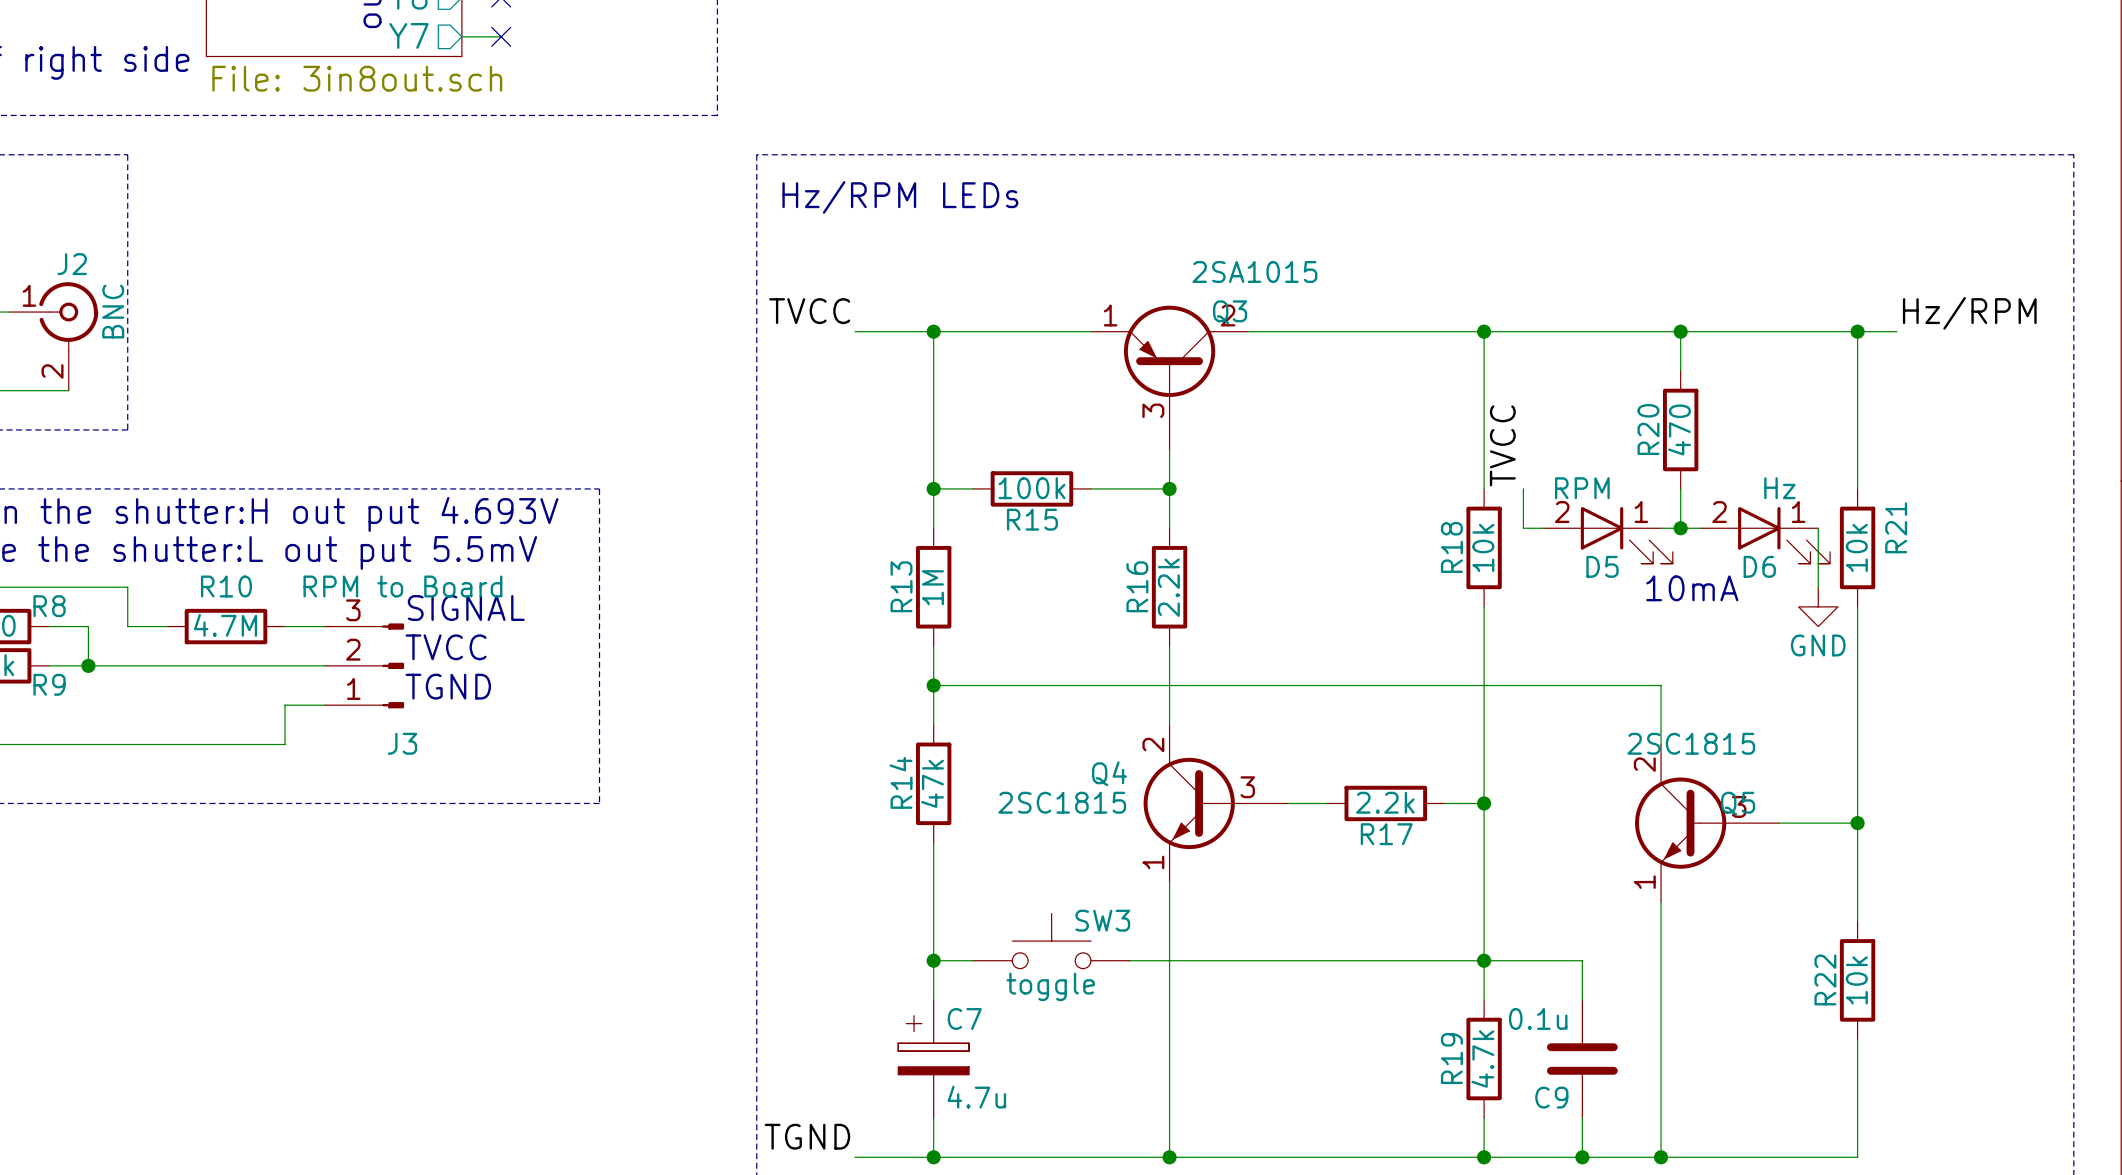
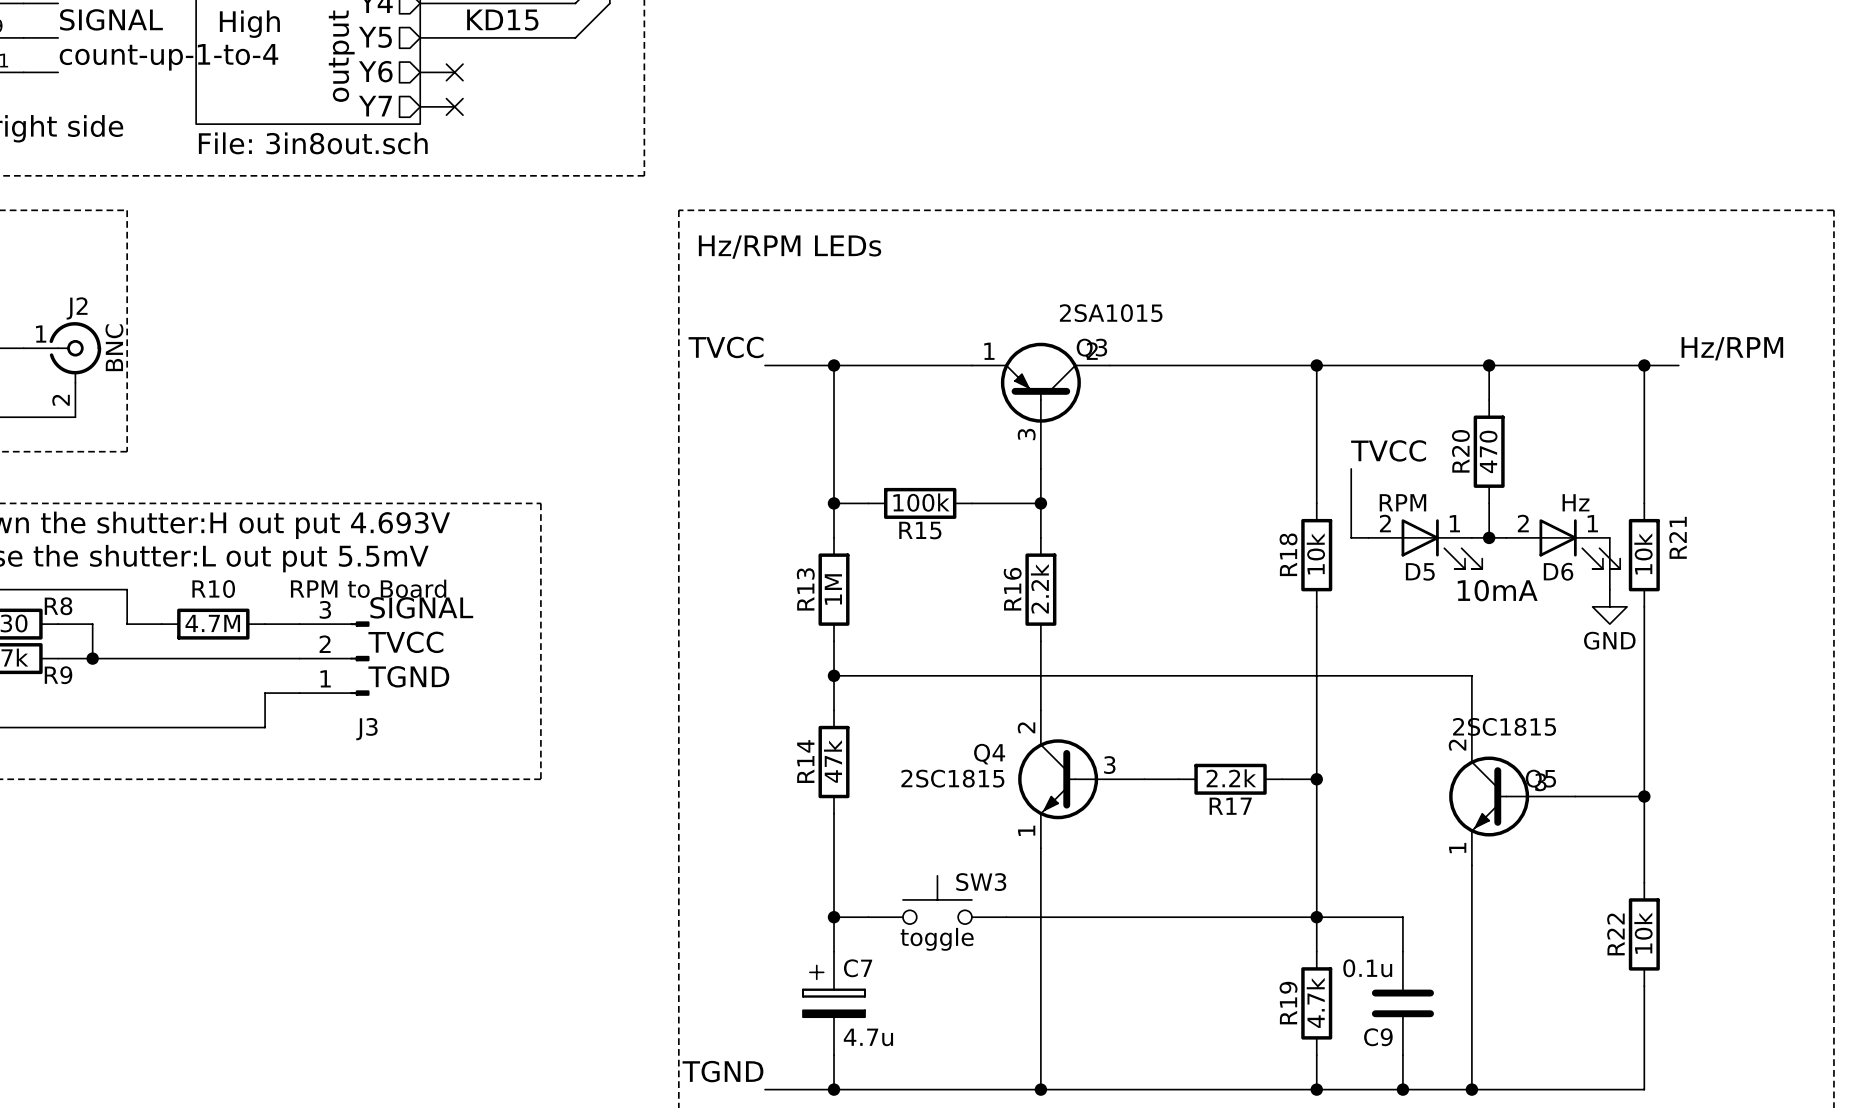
label rotation: 0° (1502, 445) -> 90° clockwise (1388, 450)
wire: none -> (1351, 468) (1351, 503)

